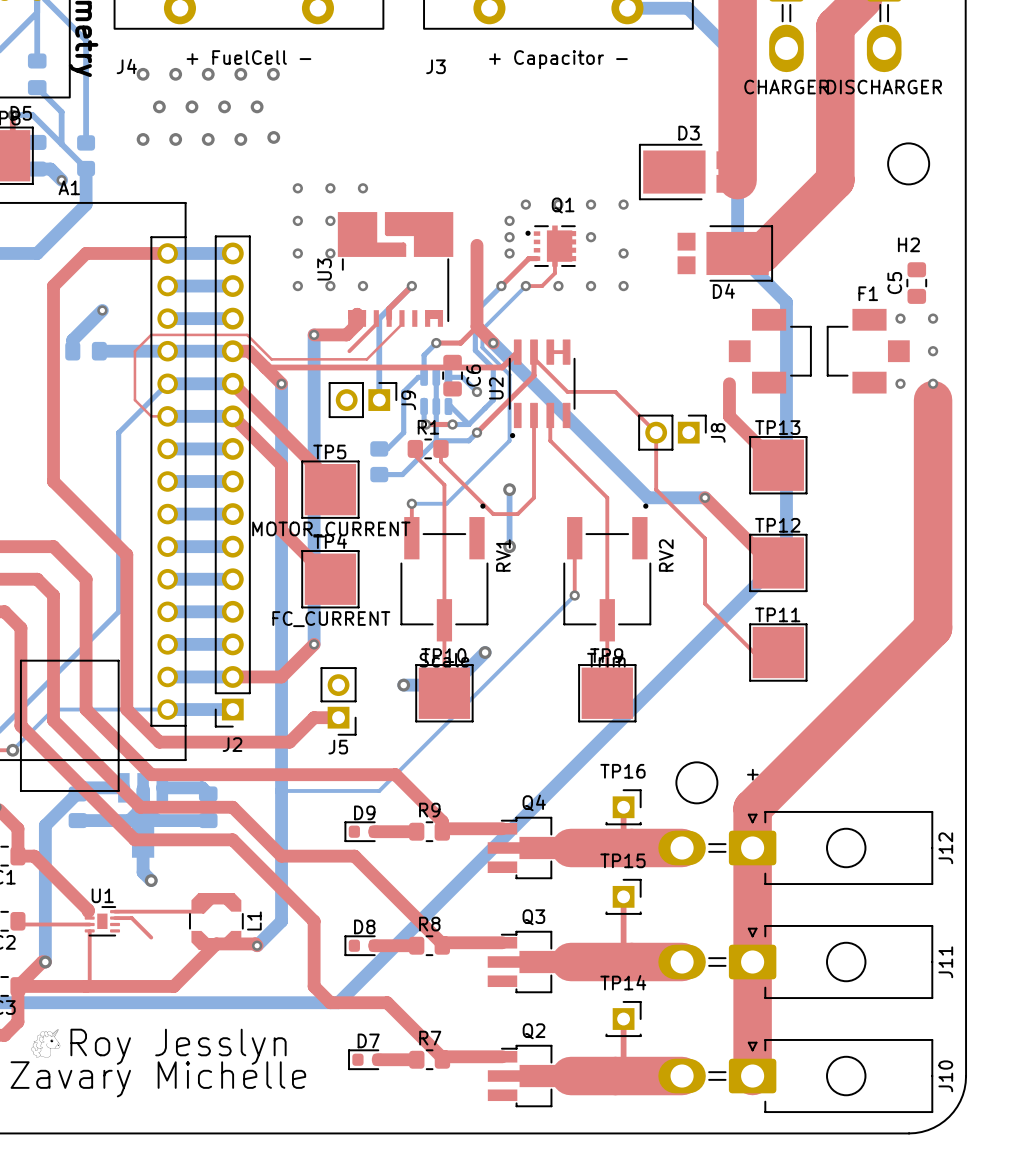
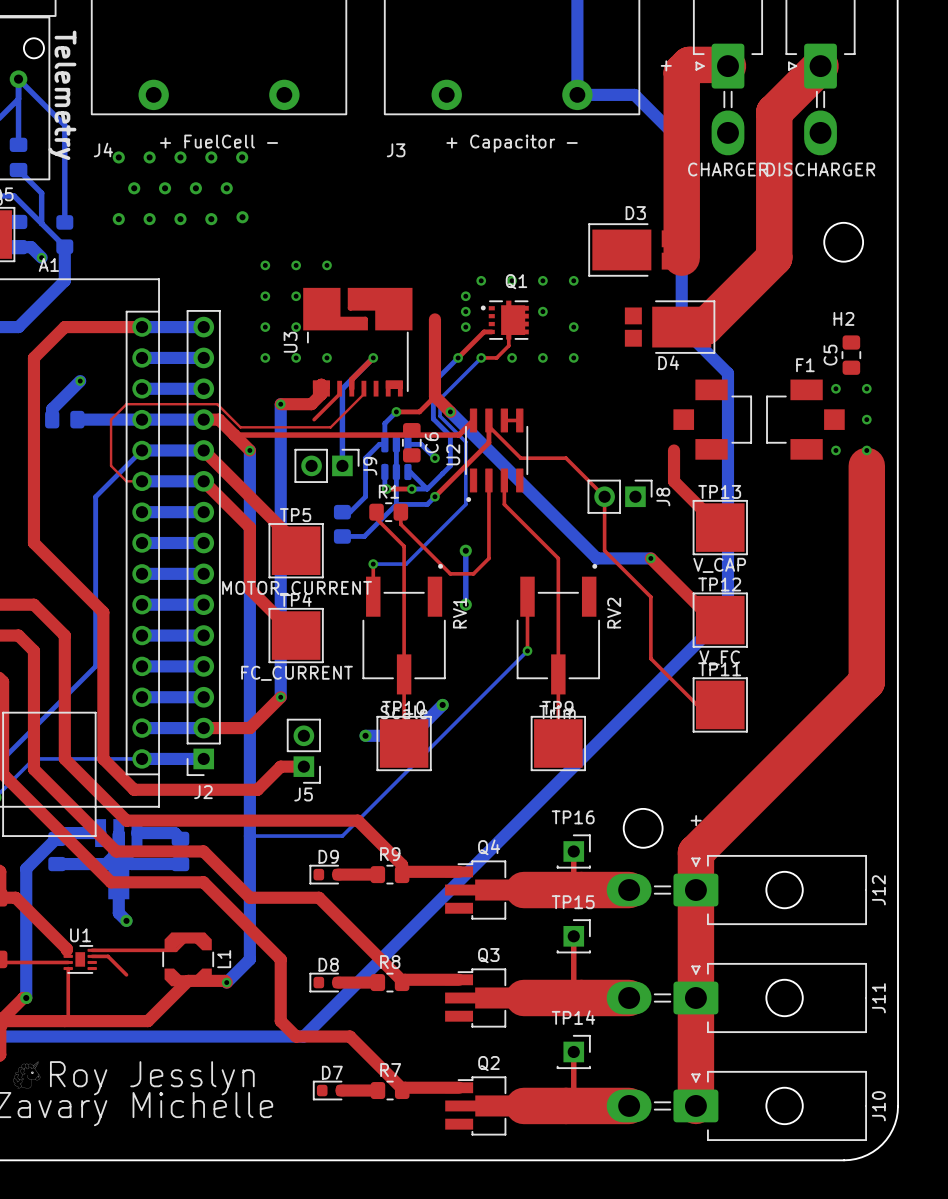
TP13 value: none -> V_CAP (719, 565)
TP12 value: none -> V_FC (719, 657)

